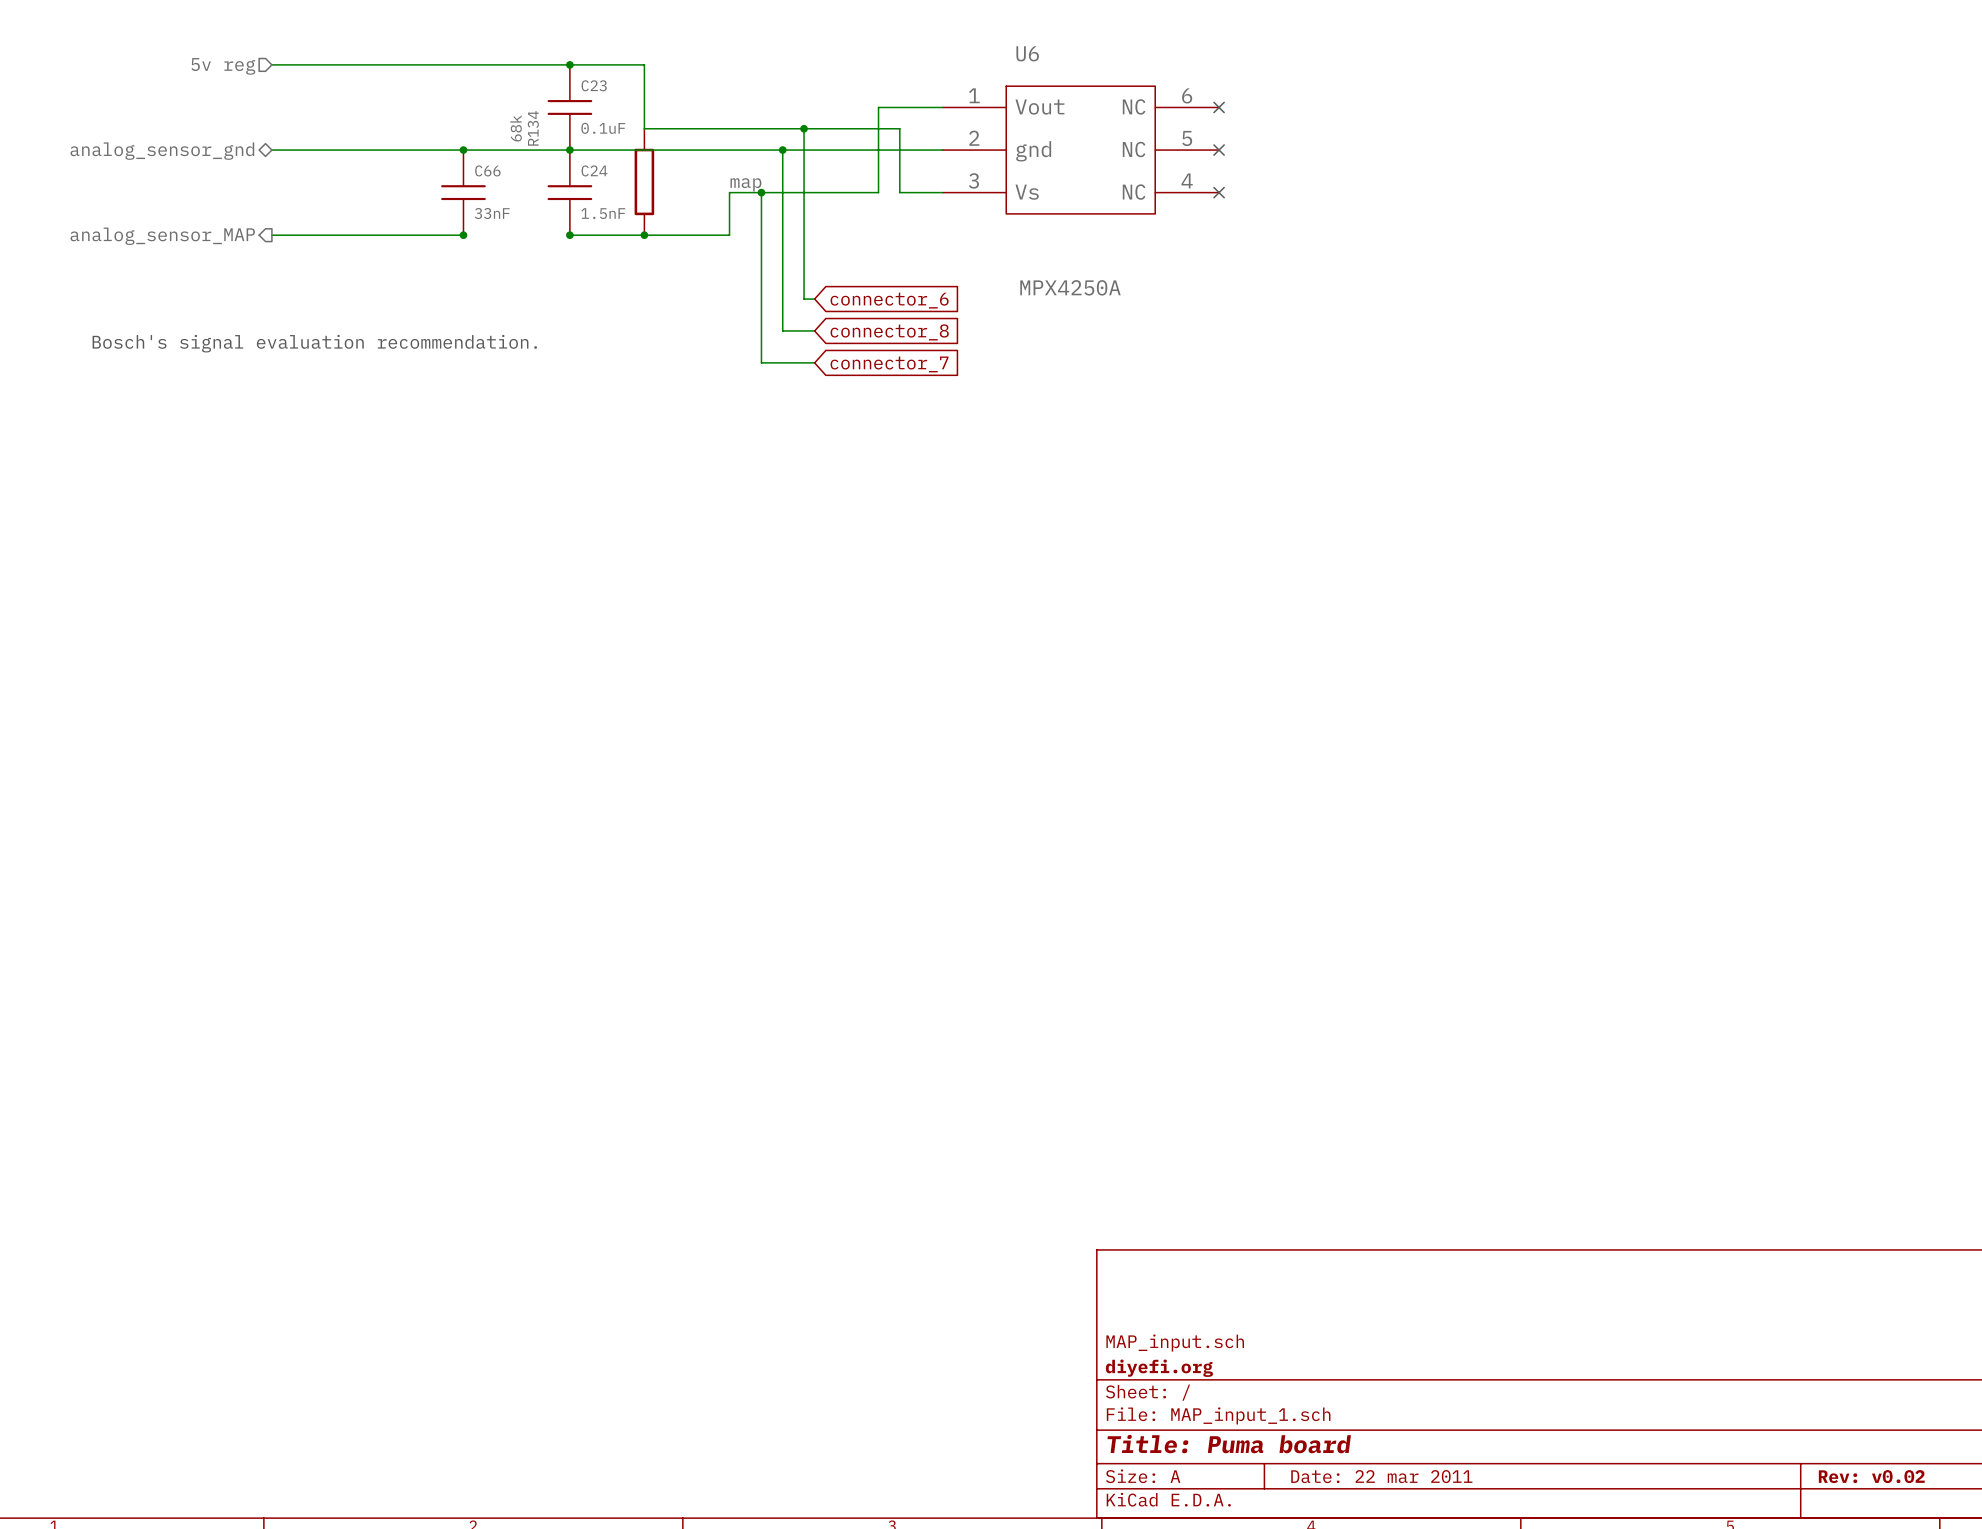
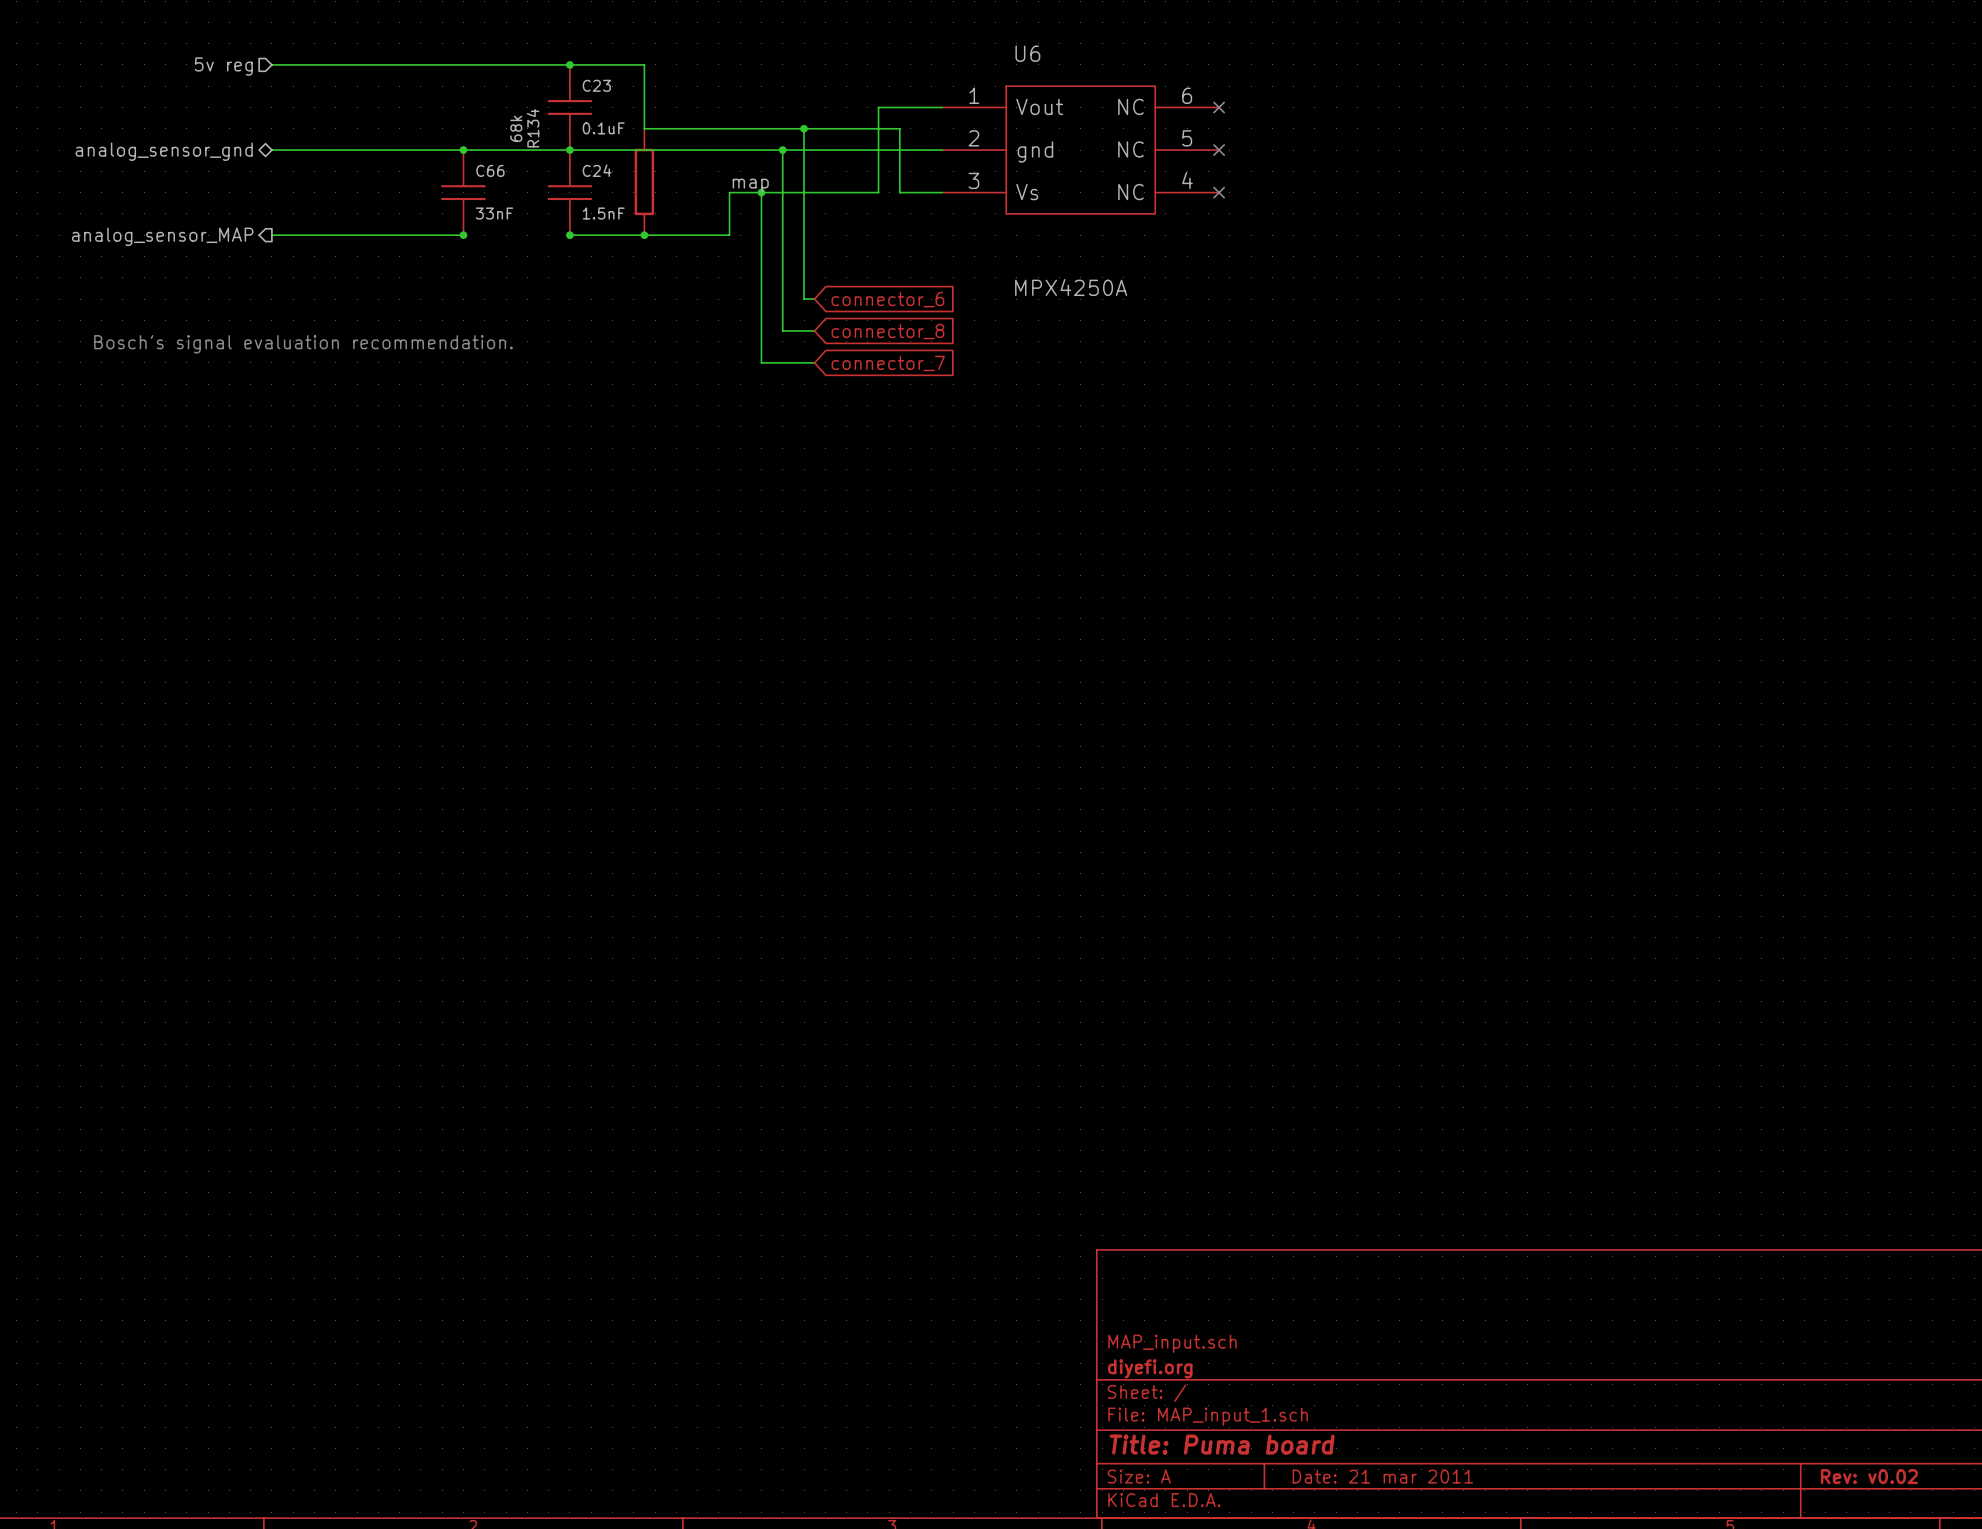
title block: Date: 22 mar 2011 (1381, 1476) -> Date: 21 mar 2011 (1382, 1476)

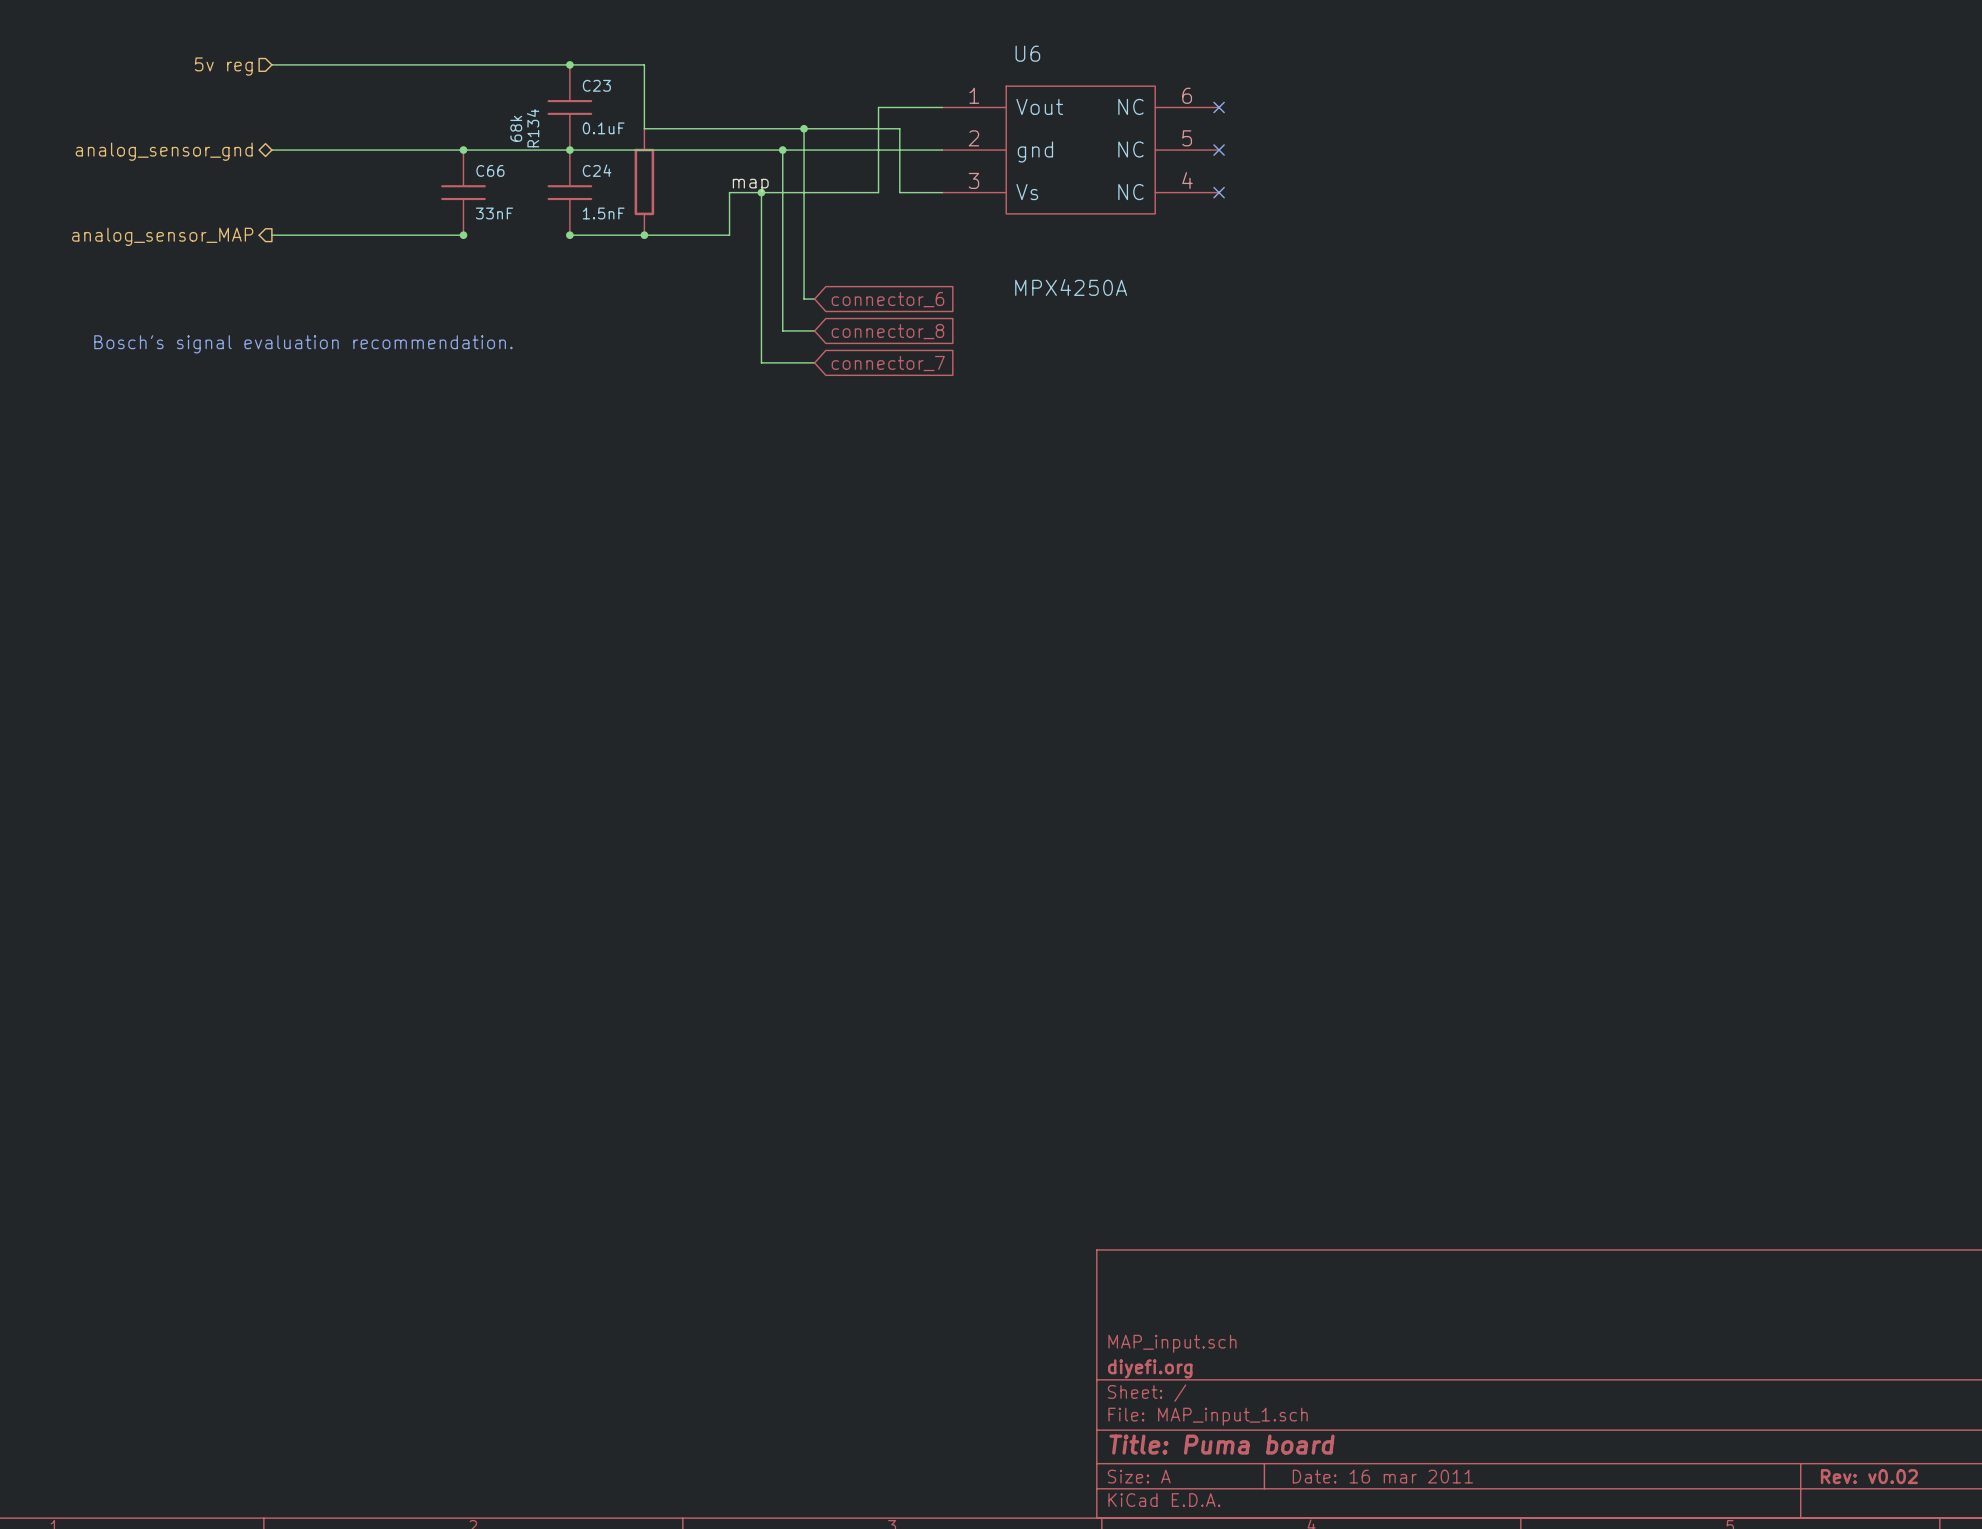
title block: Date: 21 mar 2011 (1382, 1476) -> Date: 16 mar 2011 (1382, 1476)

